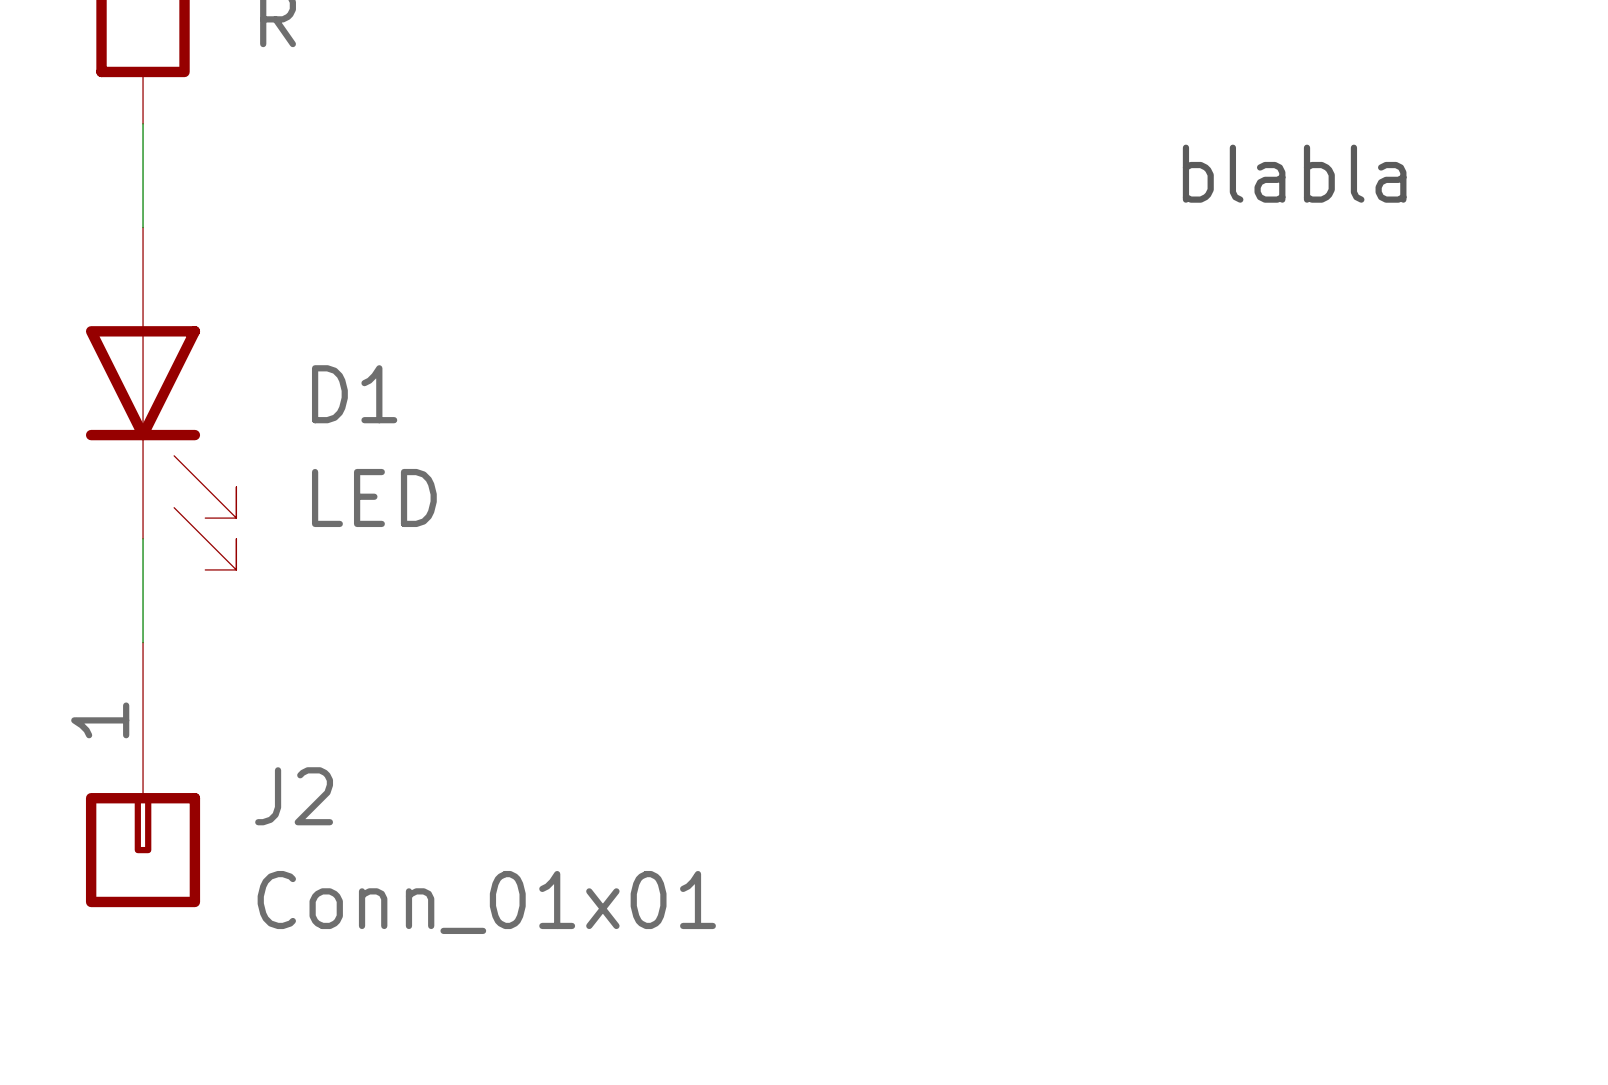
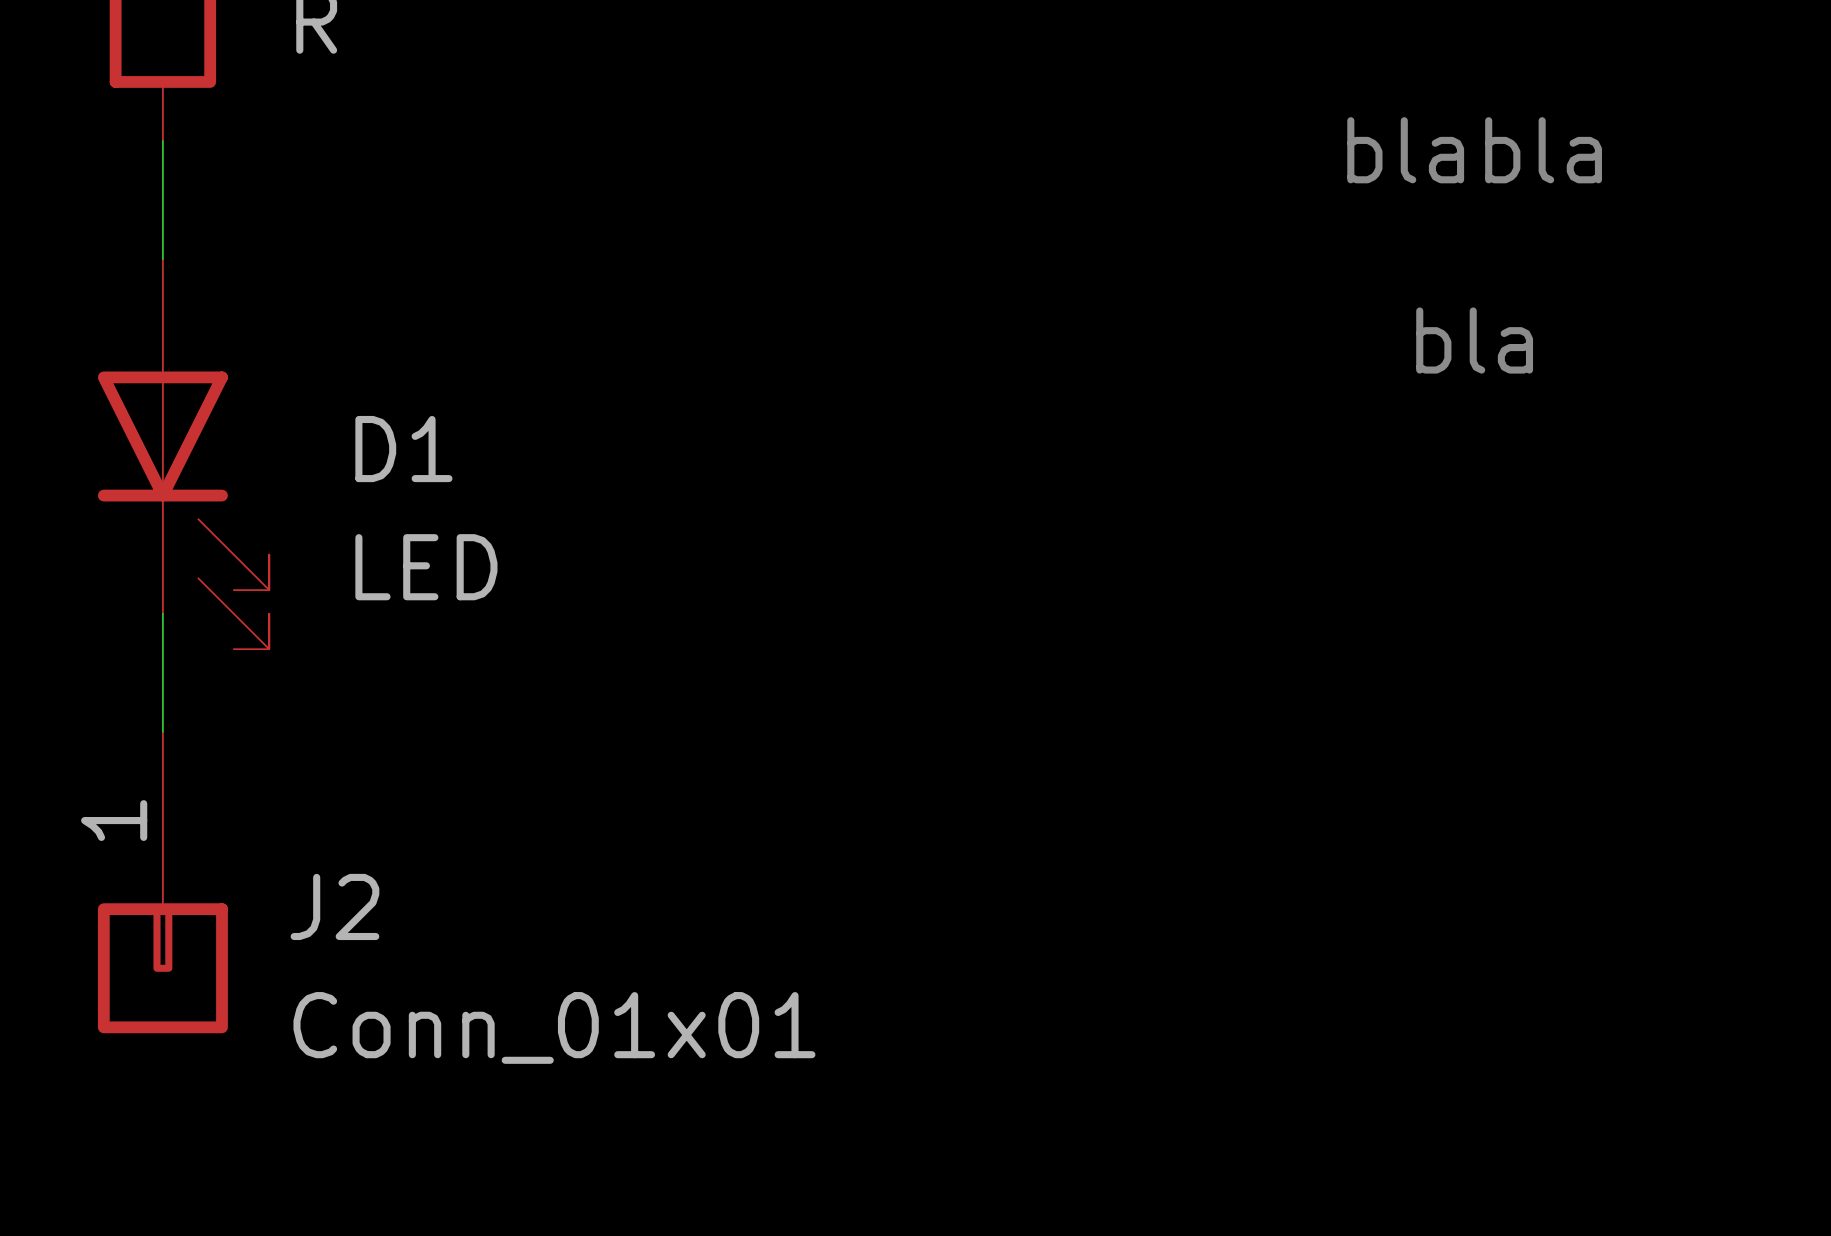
text position: blabla (1294, 173) -> blabla (1474, 150)
text: none -> bla (1474, 340)

